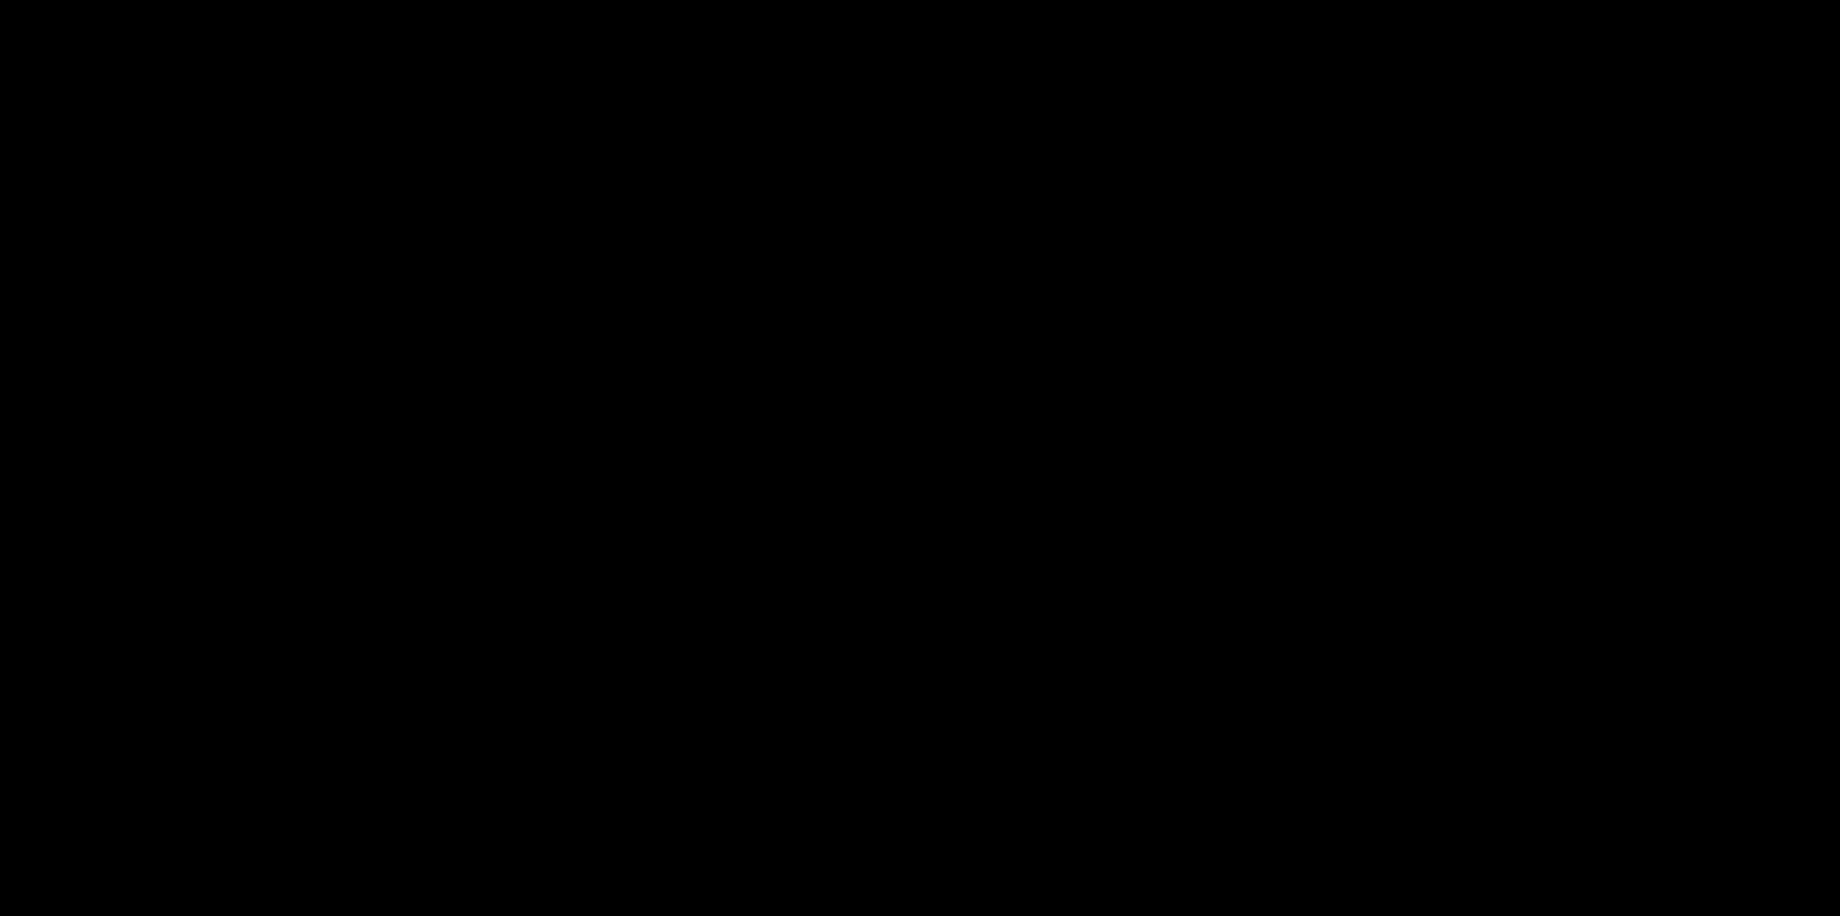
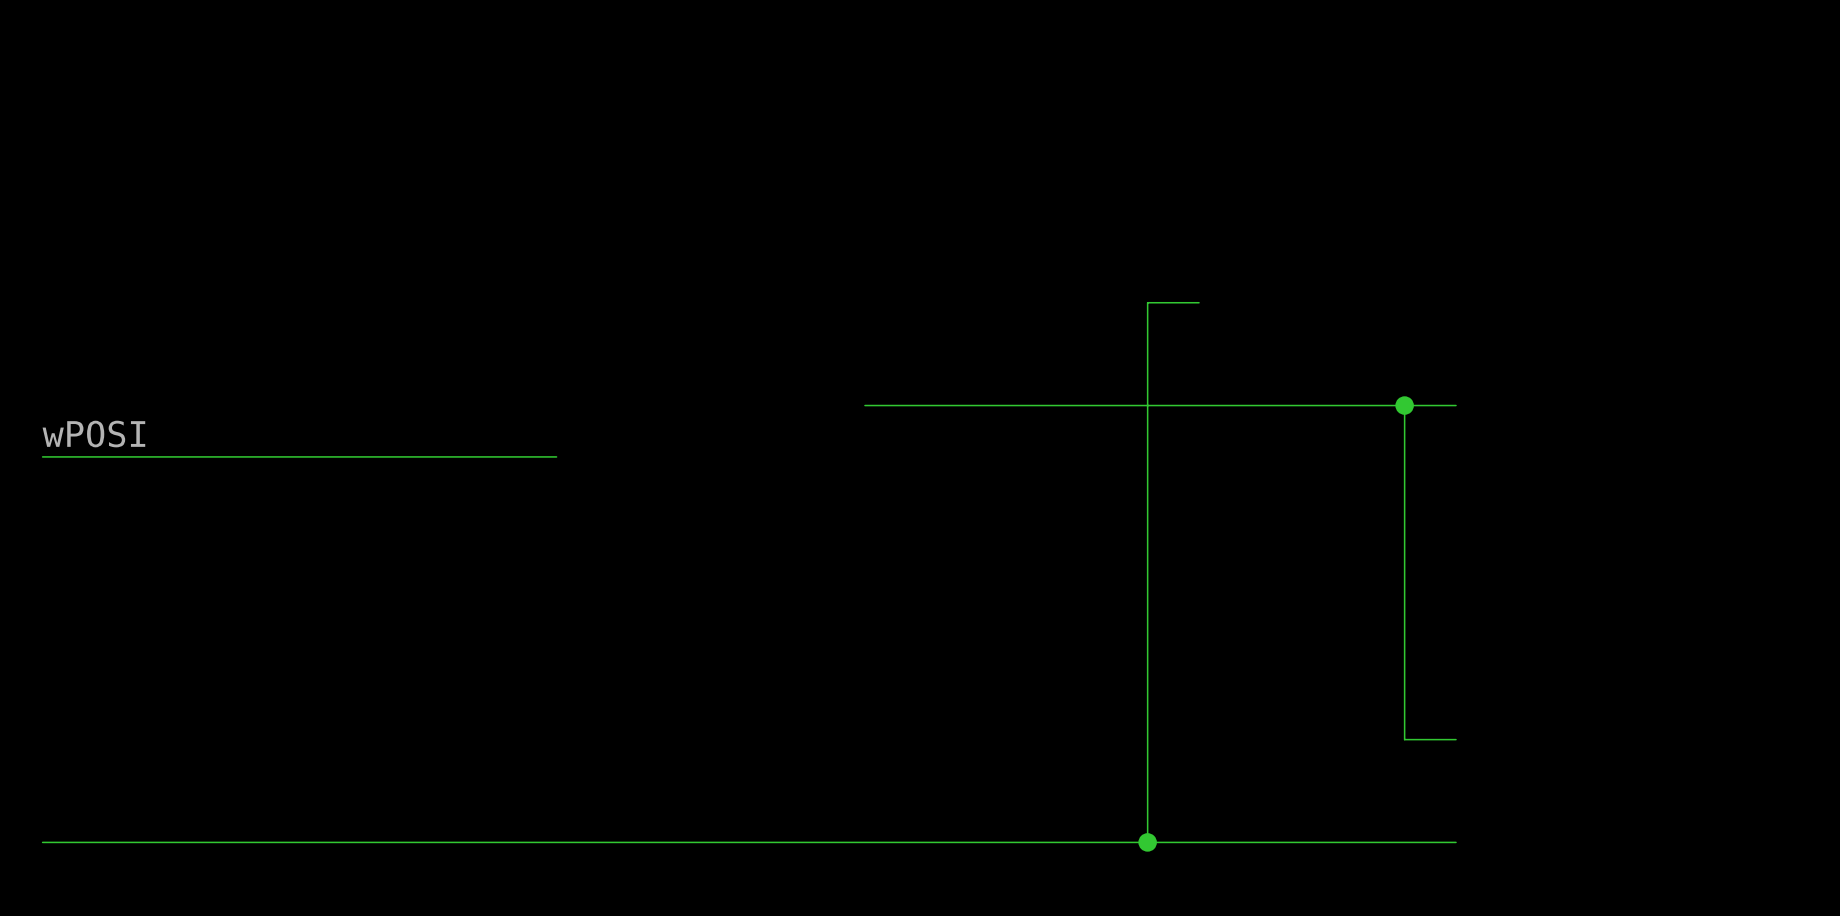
wire: none -> (1199, 302) (1147, 302) (1147, 842)
wire: none -> (864, 405) (1456, 405)
wire: none -> (1404, 405) (1404, 739) (1456, 739)
junction: none -> (1404, 405)
label: none -> wPOSI (93, 434)
wire: none -> (42, 456) (556, 456)
wire: none -> (42, 842) (1456, 842)
junction: none -> (1147, 842)

